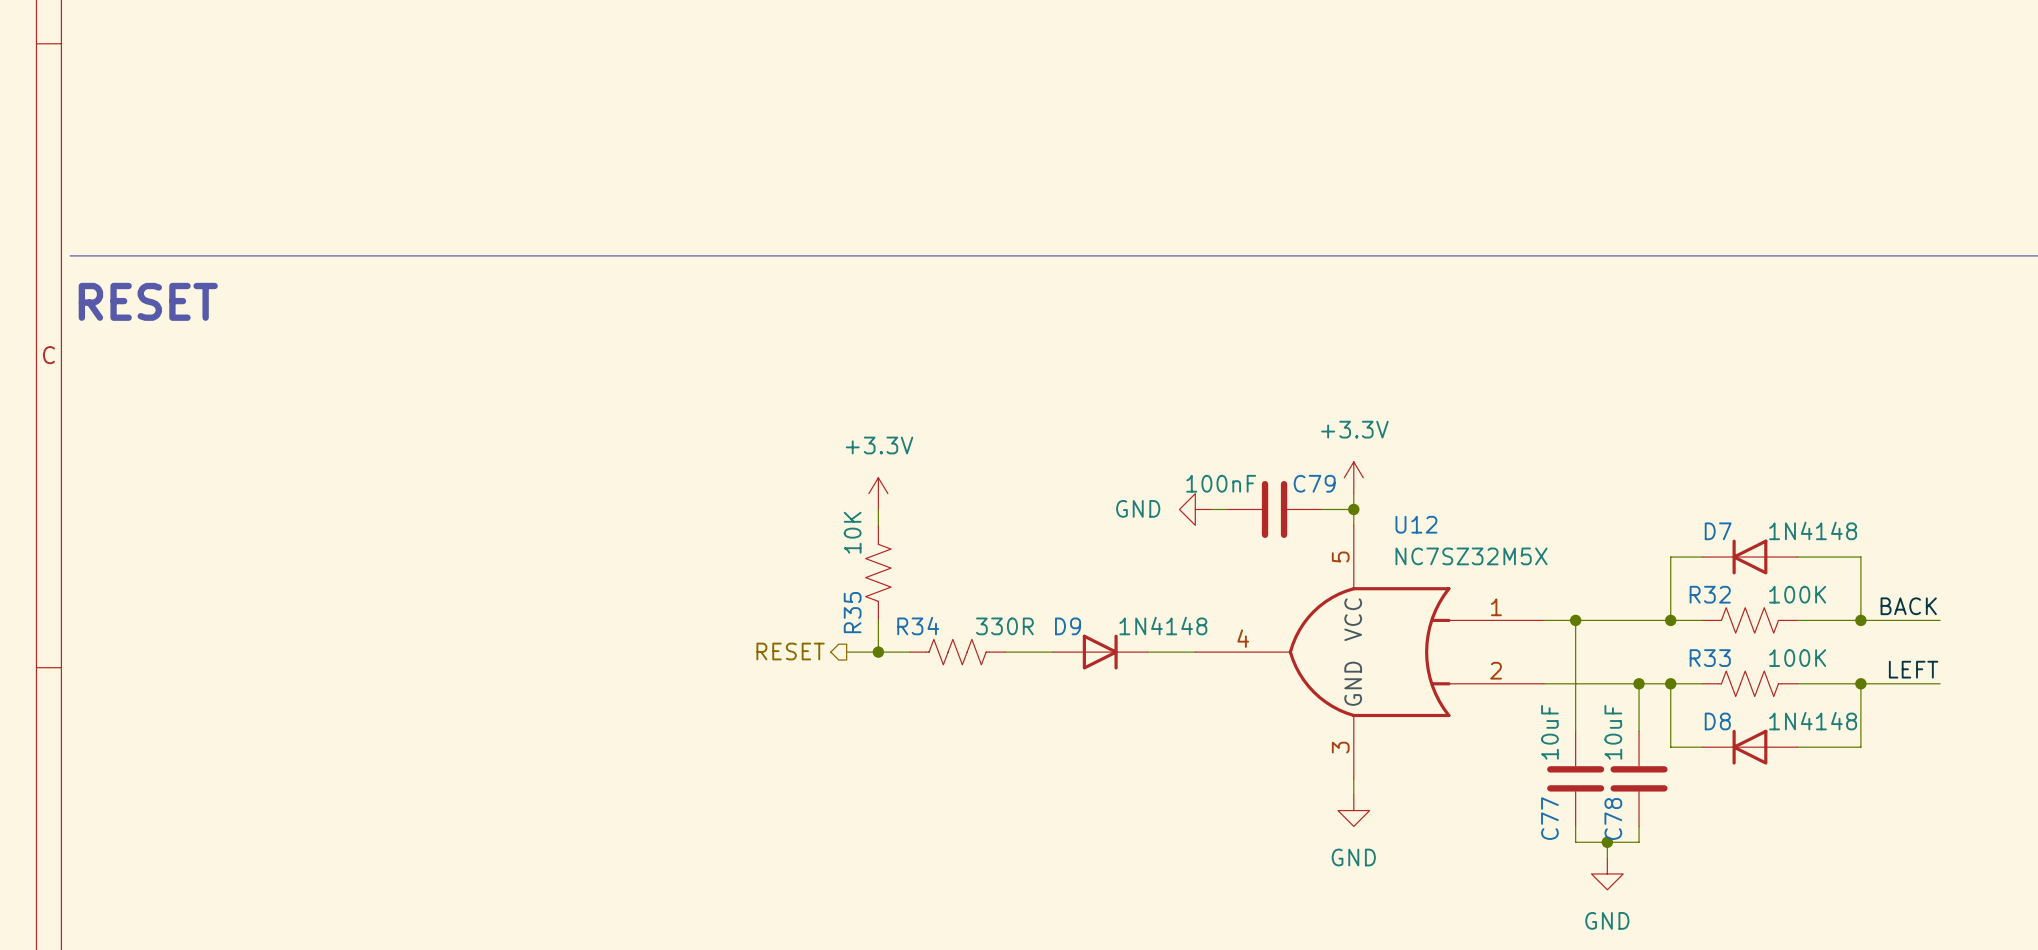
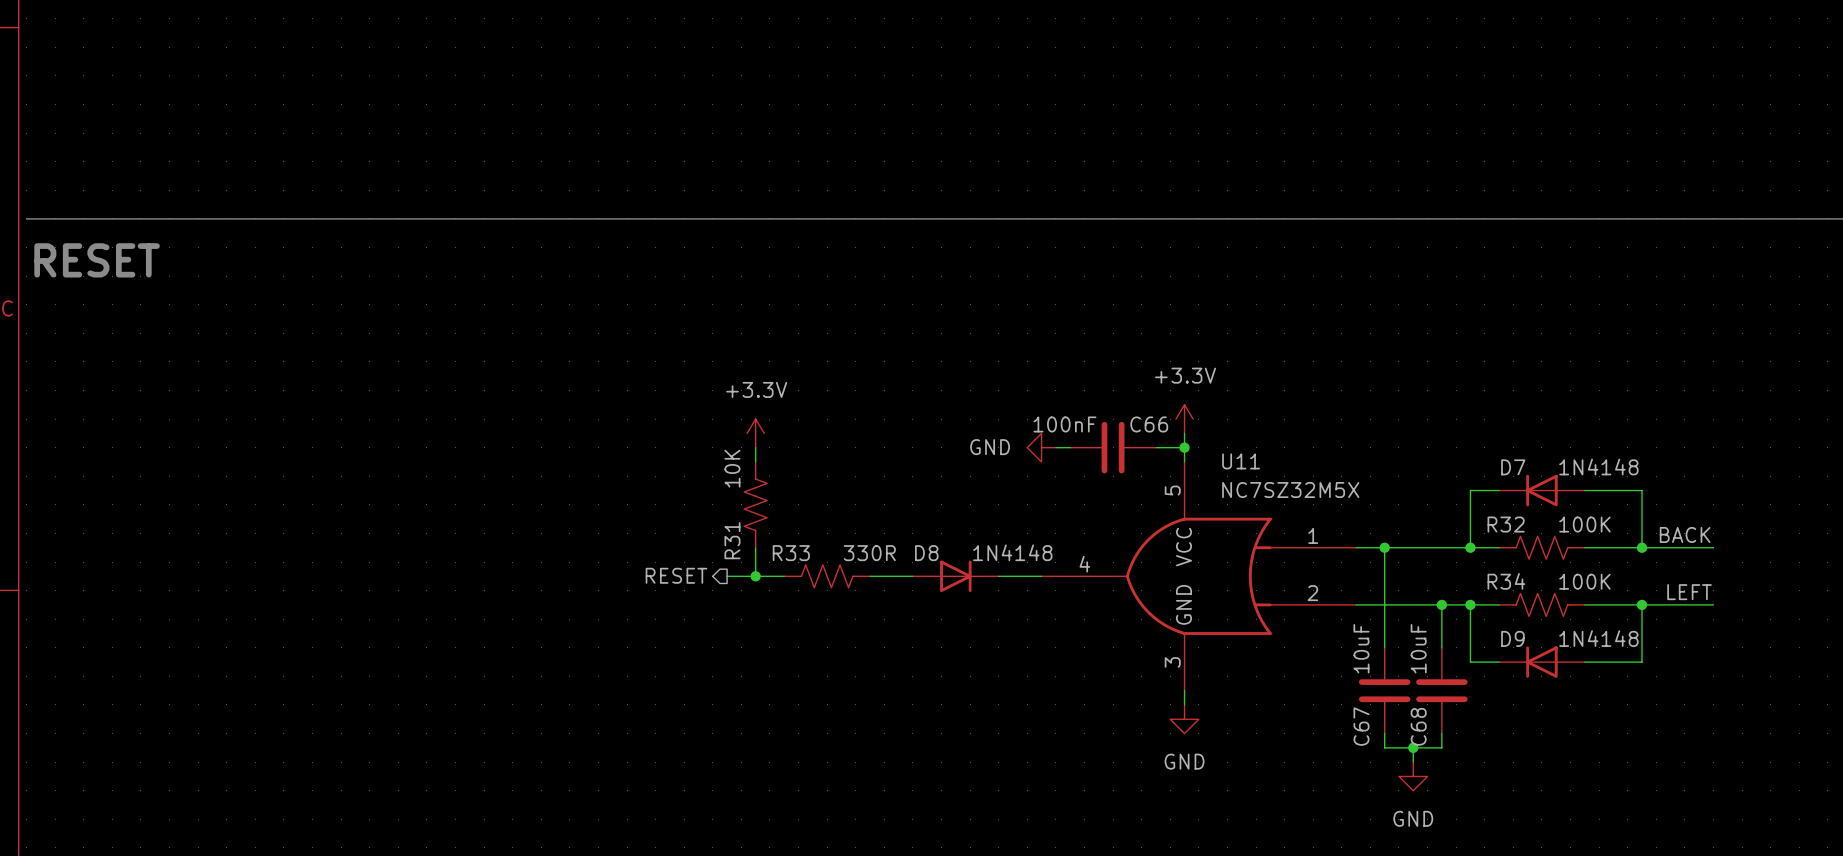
C79 name: C79 (1314, 483) -> C66 (1149, 424)
U12 name: U12 (1416, 524) -> U11 (1241, 461)
R35 name: R35 (852, 612) -> R31 (732, 540)
R34 name: R34 (918, 626) -> R33 (791, 553)
D9 name: D9 (1068, 626) -> D8 (926, 553)
R33 name: R33 (1710, 658) -> R34 (1506, 581)
D8 name: D8 (1717, 721) -> D9 (1512, 638)
C77 name: C77 (1549, 818) -> C67 (1361, 726)
C78 name: C78 (1613, 818) -> C68 (1418, 726)

